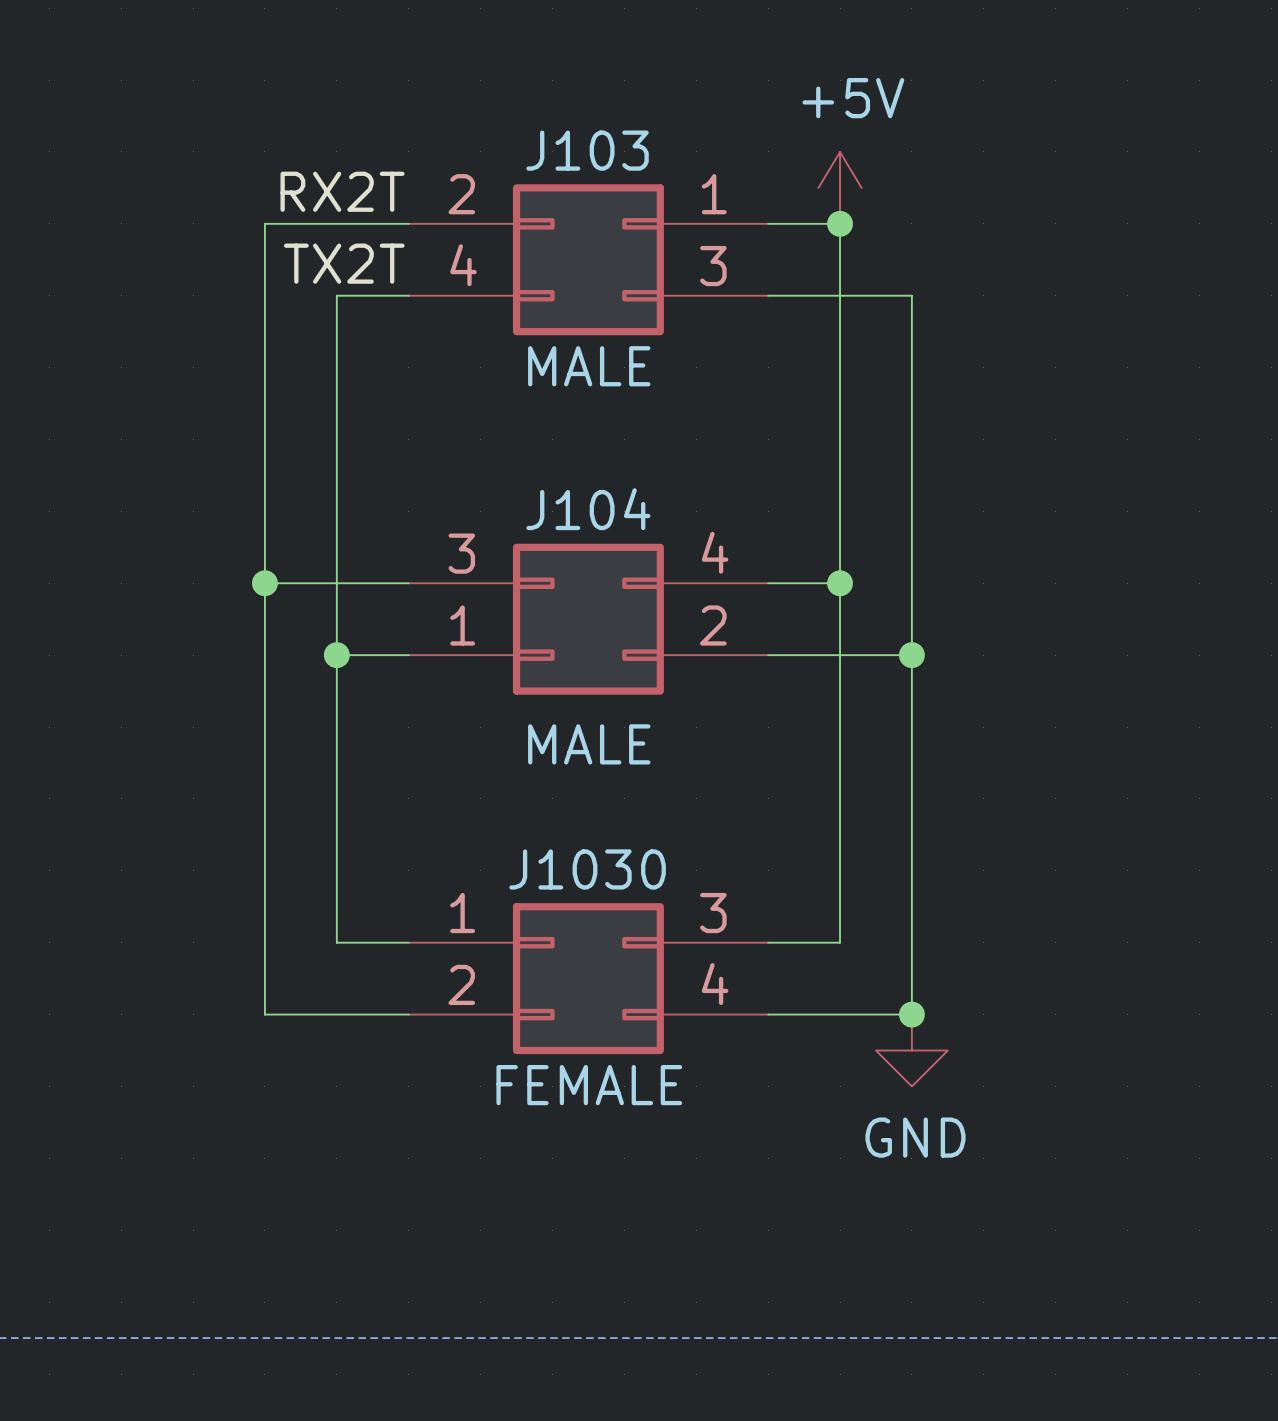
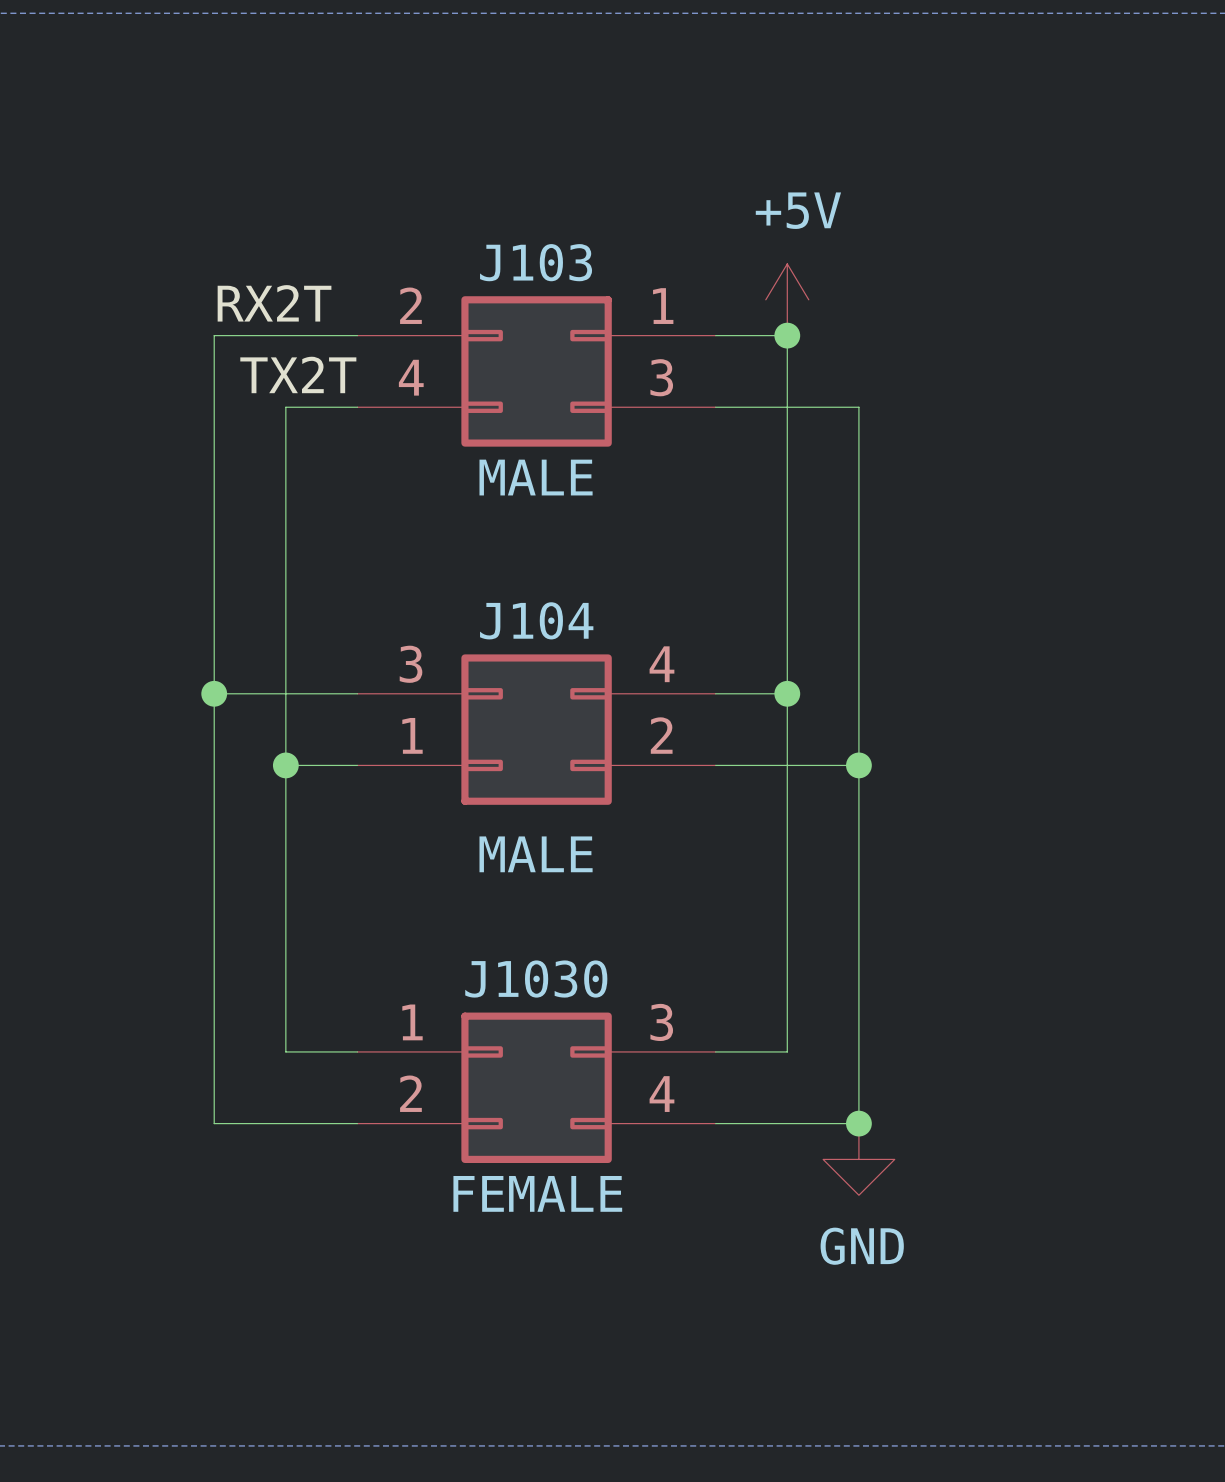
label position: RX2T (342, 191) -> RX2T (274, 303)

